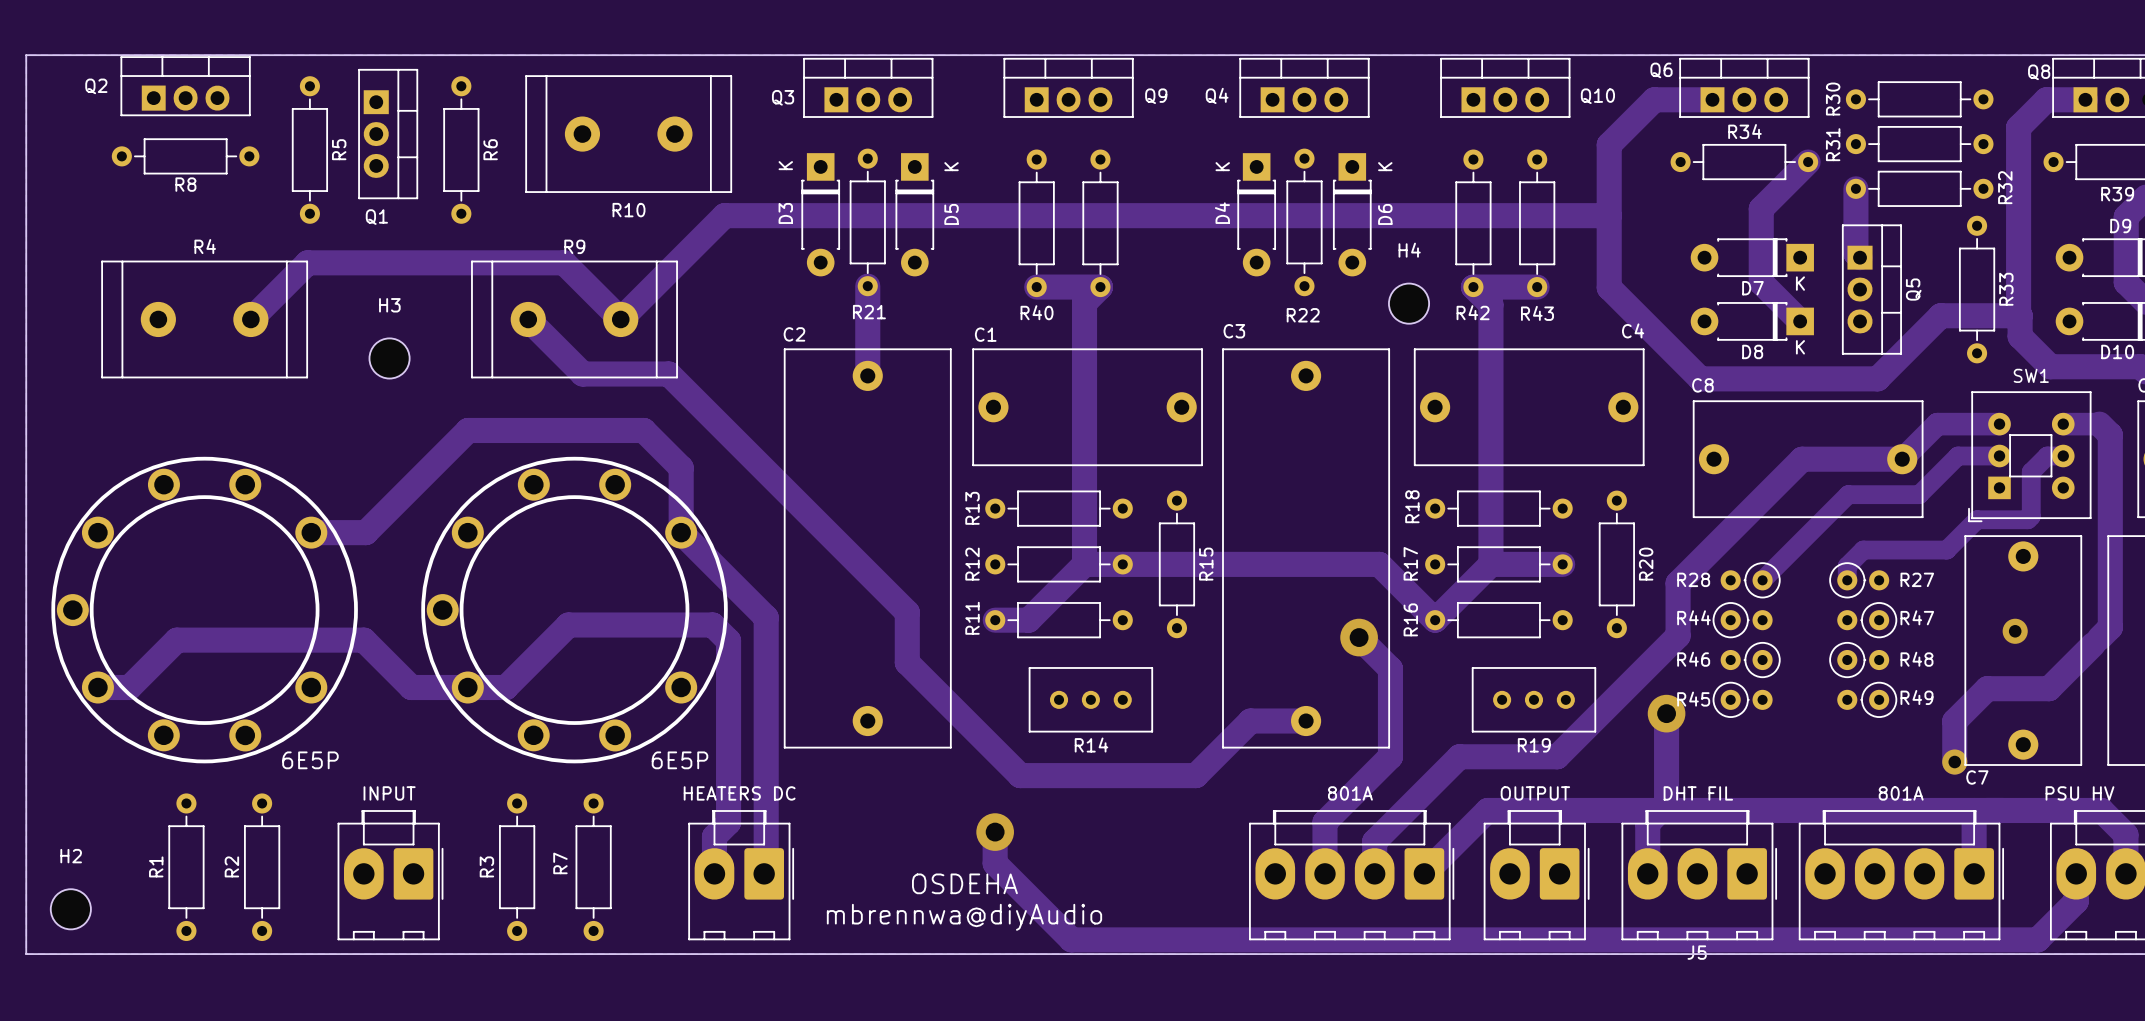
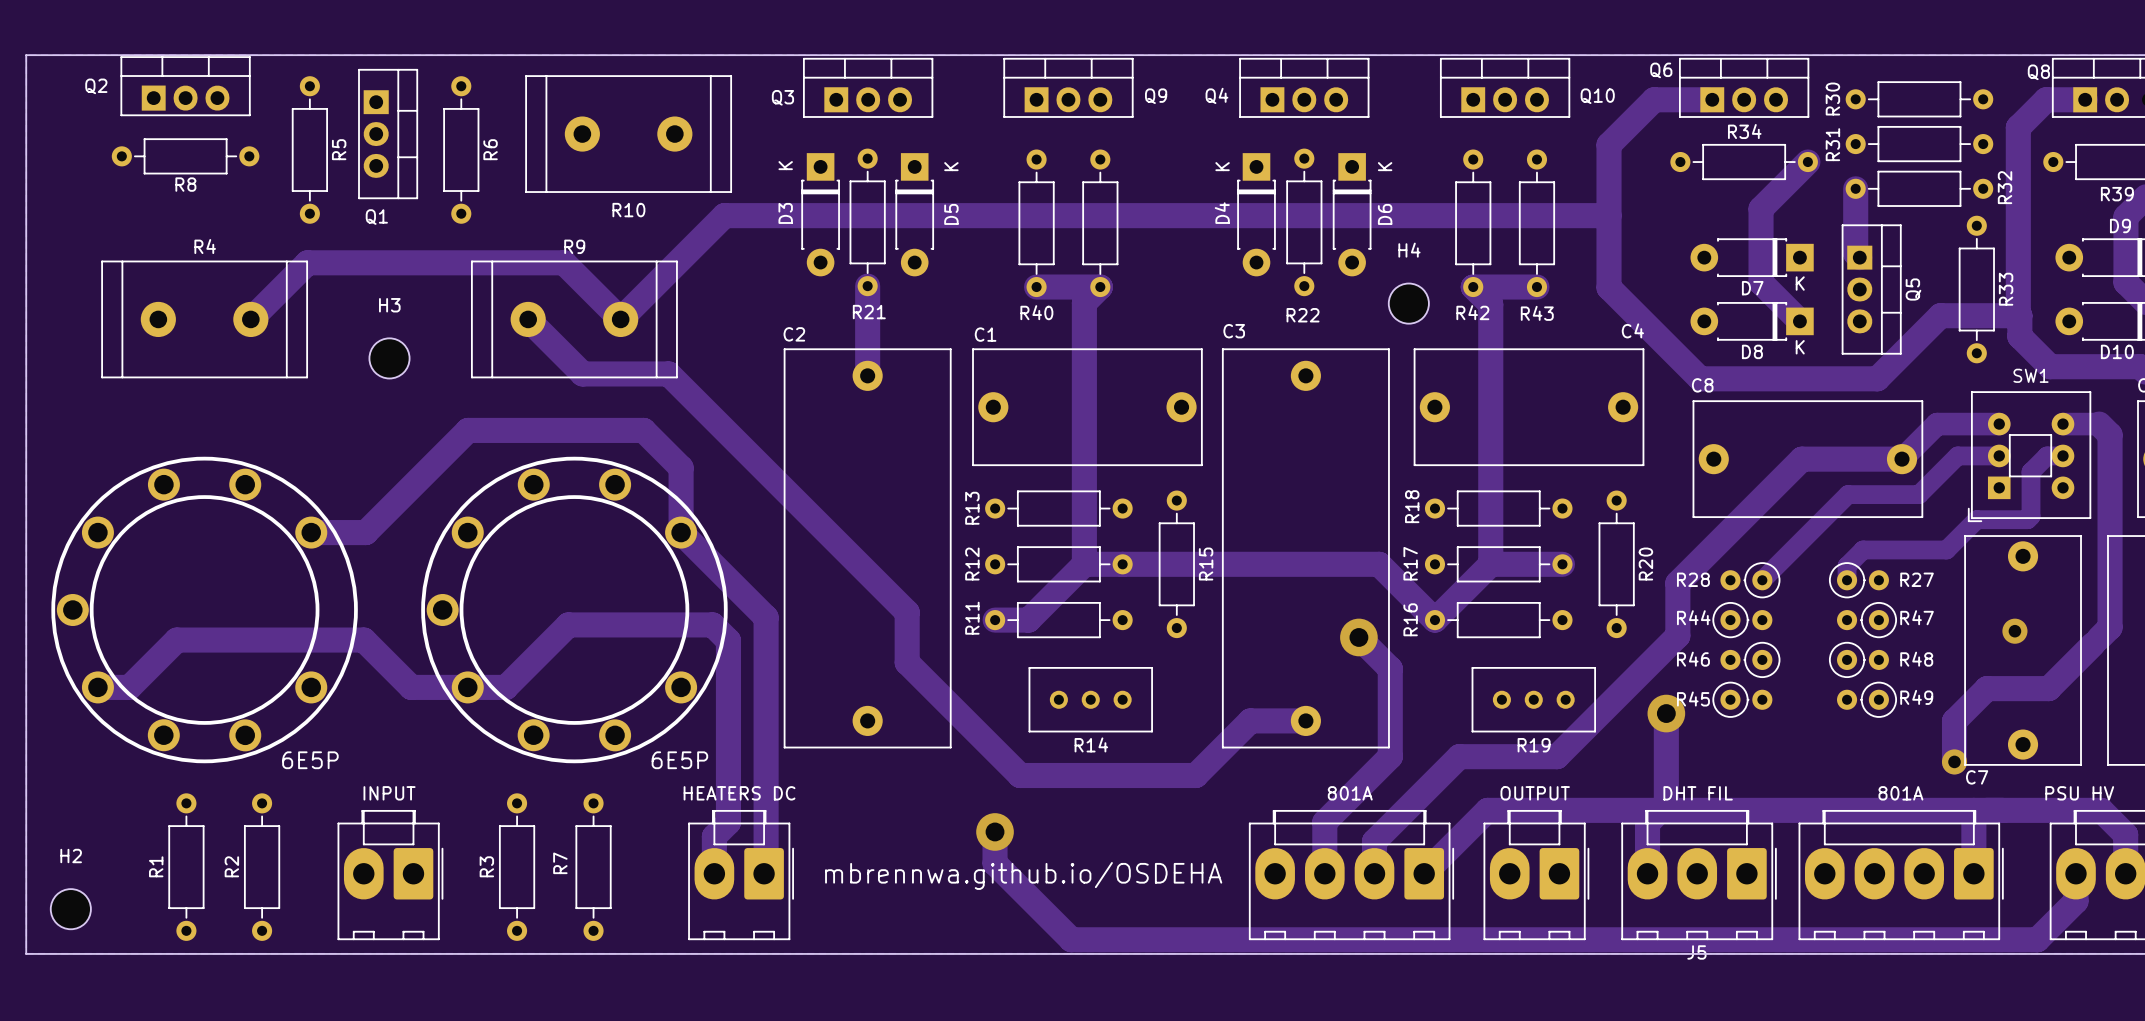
text: none -> mbrennwa.github.io/OSDEHA (1023, 875)
text: OSDEHA (964, 883) -> none
text: mbrennwa@diyAudio (964, 917) -> none

